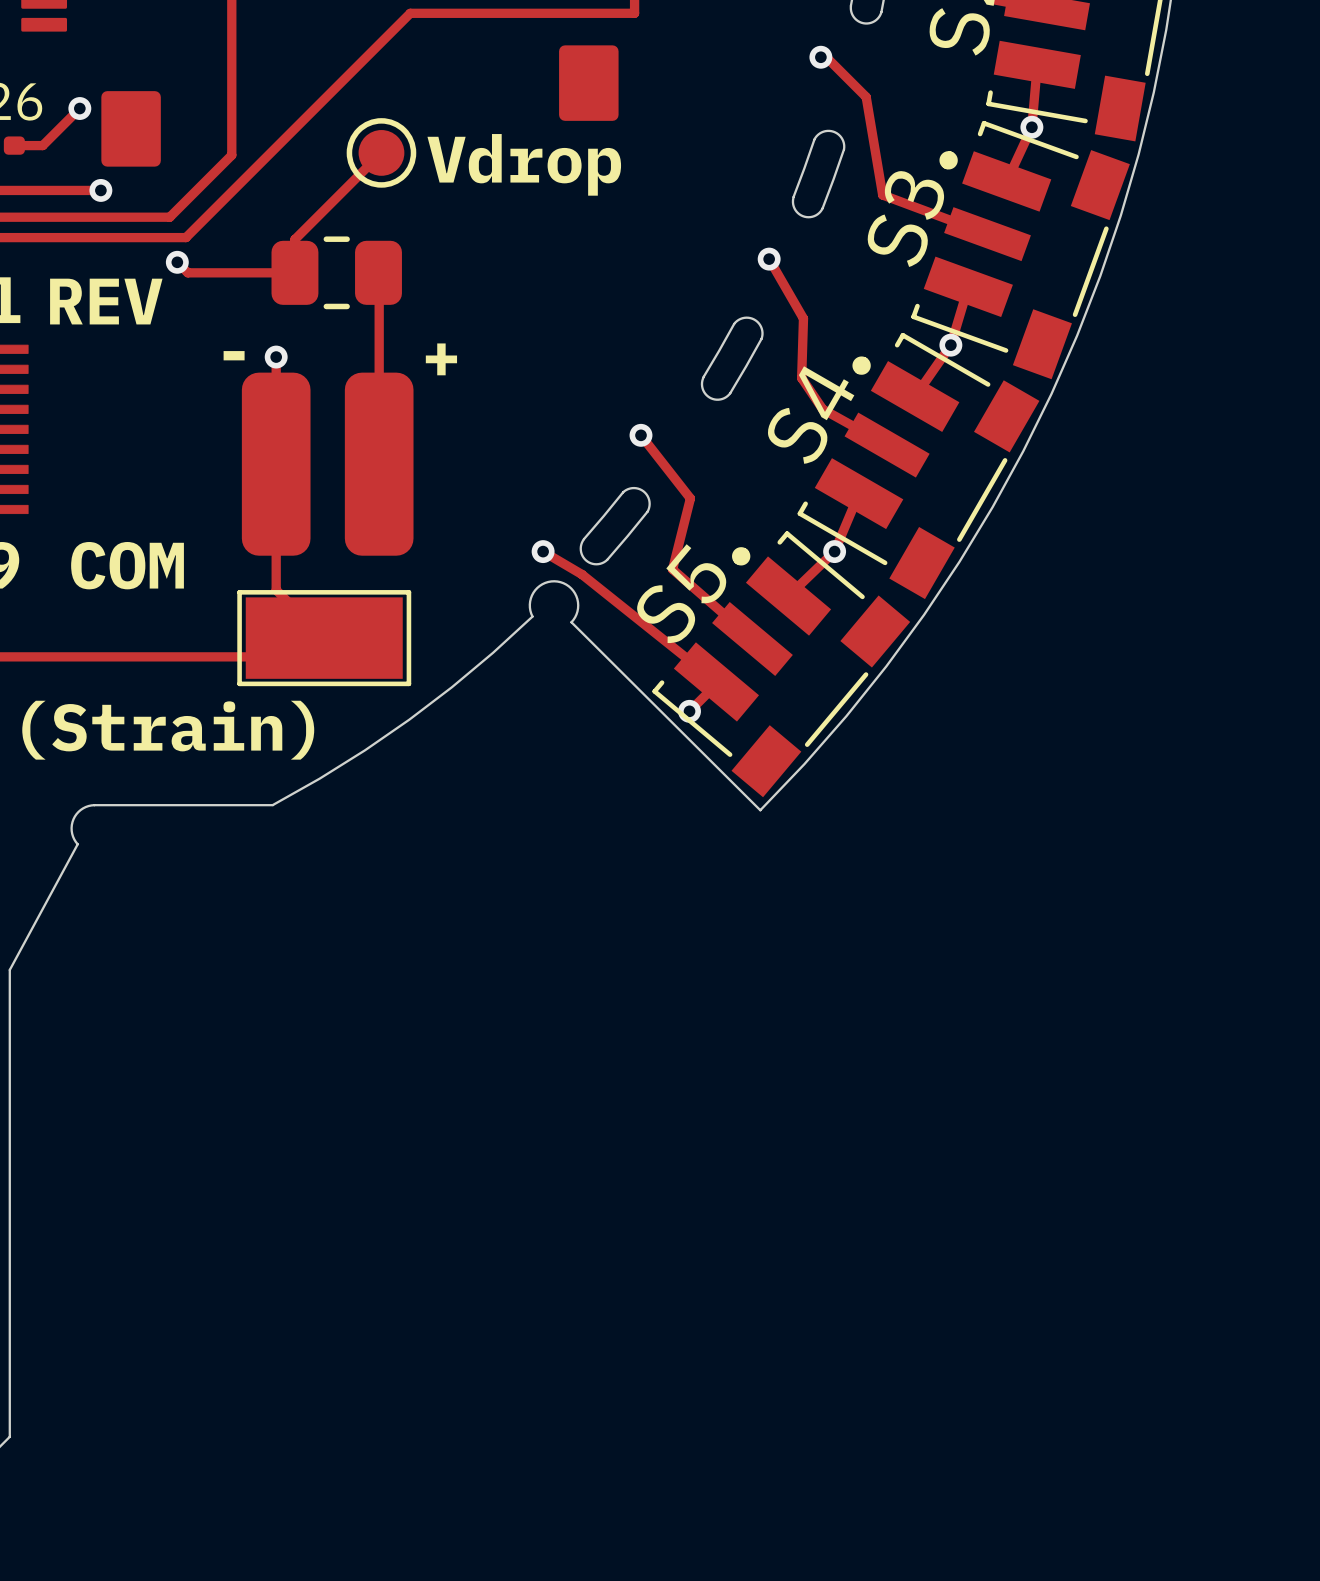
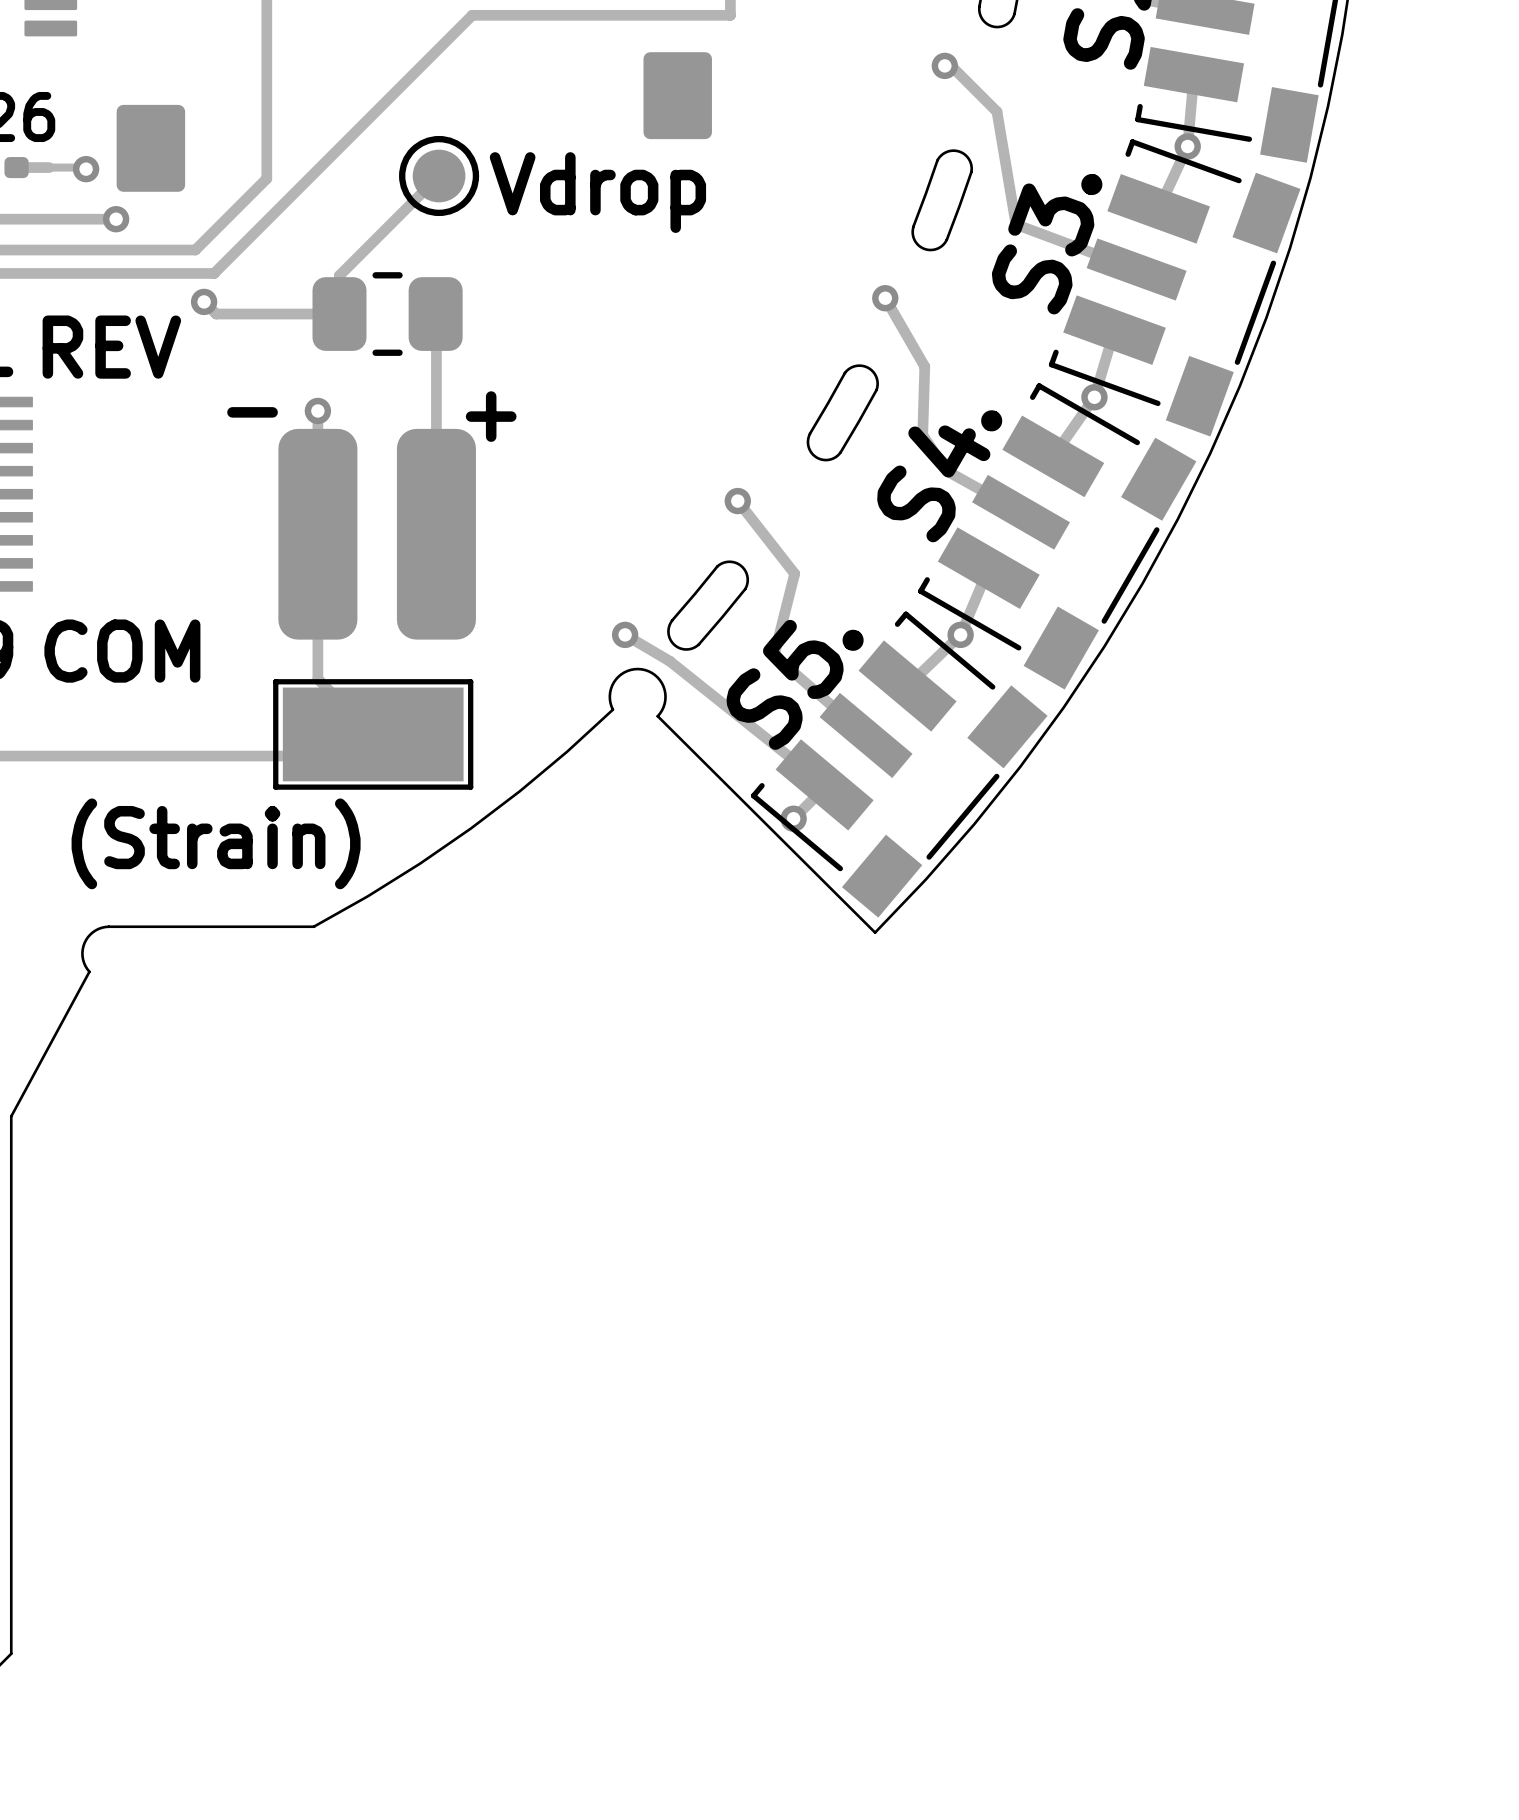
track: (79, 108) (42, 145) -> (86, 169) (84, 167) (49, 167)
via position: (79, 108) -> (86, 169)

